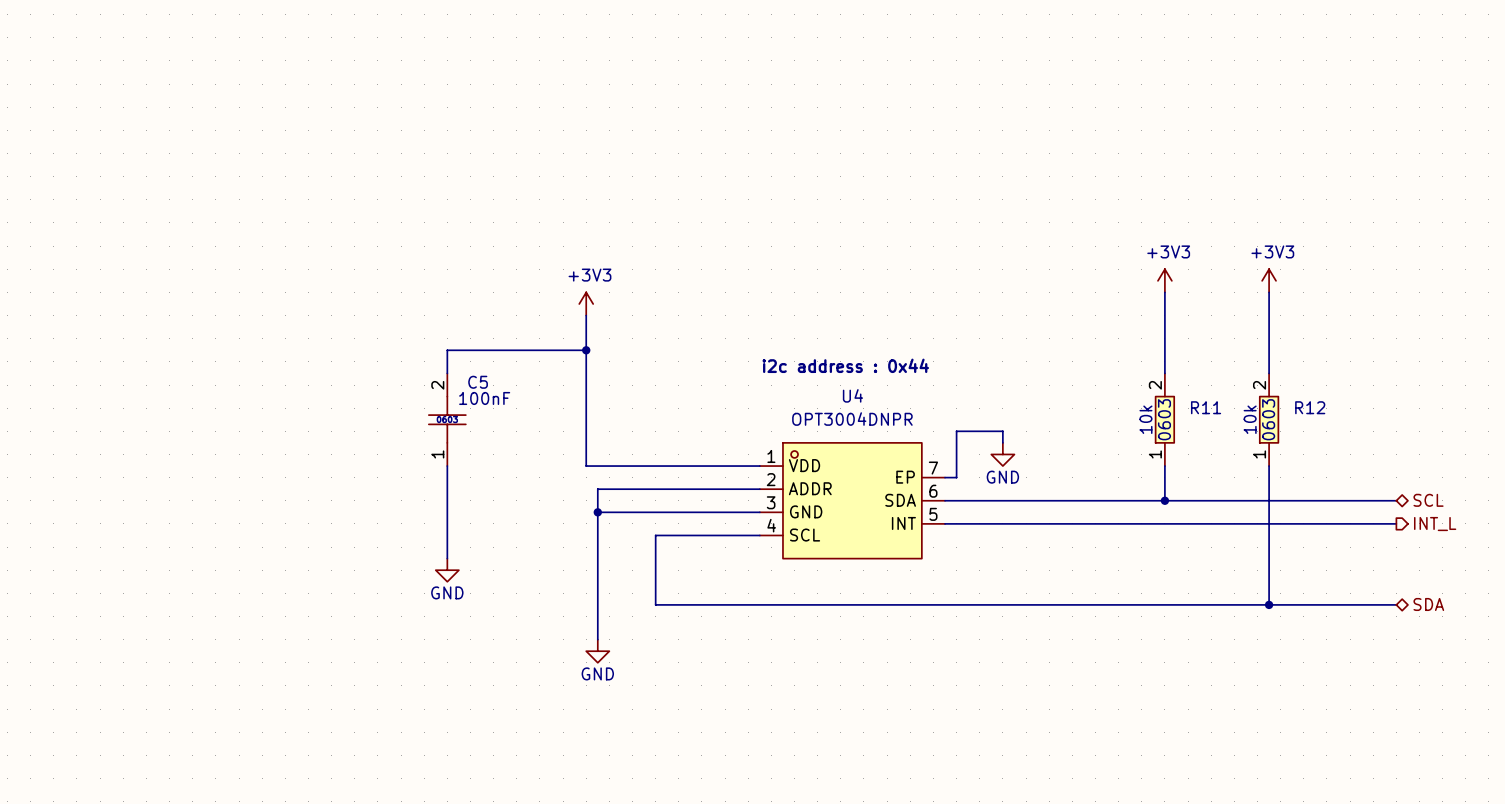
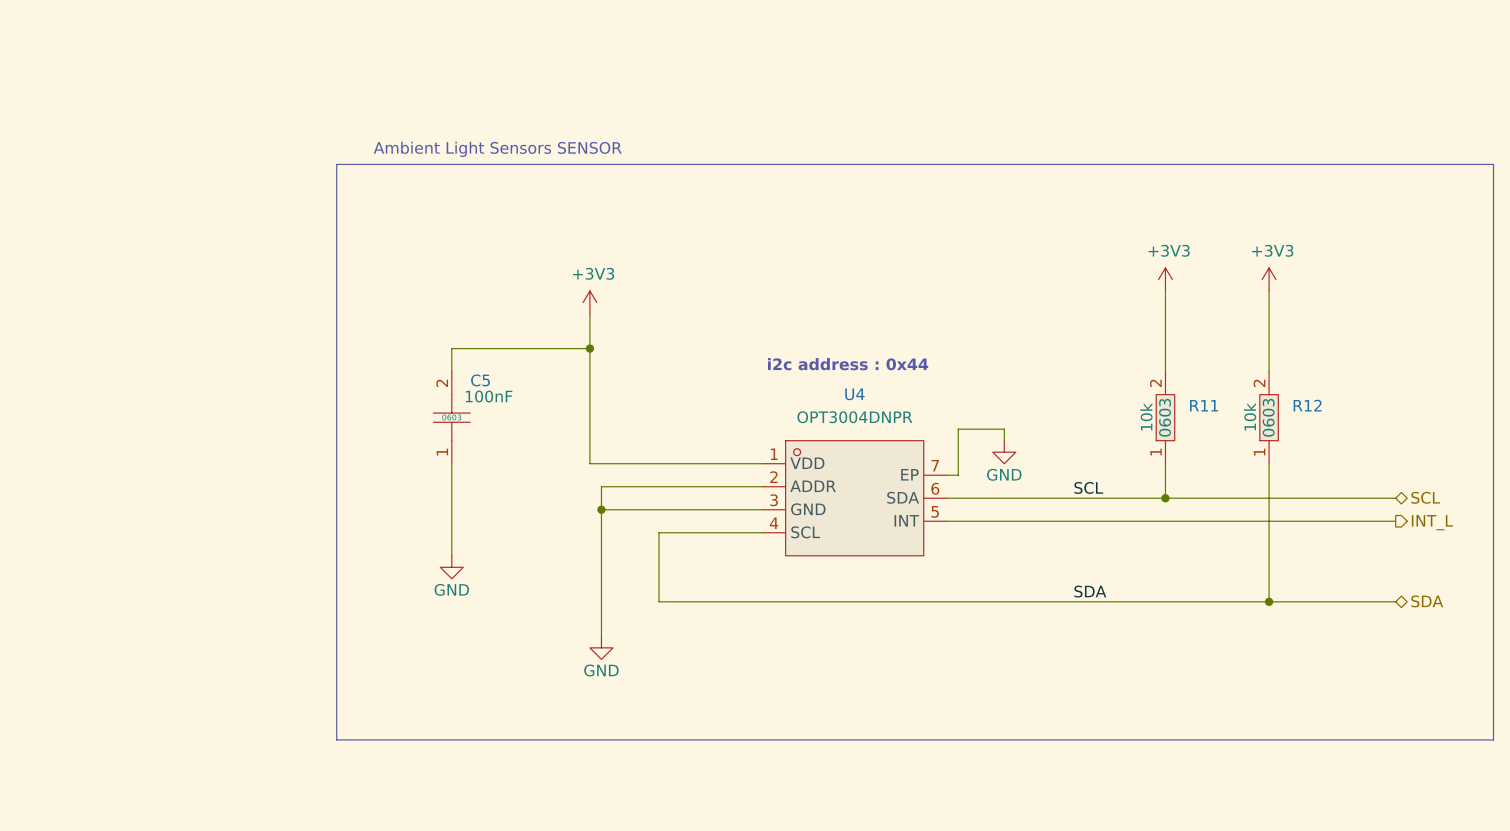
text: none -> Ambient Light Sensors SENSOR (497, 149)
line: none -> (336, 164) (1493, 164) (1493, 739) (336, 739) (336, 164)
label: none -> SCL (1088, 487)
label: none -> SDA (1090, 591)

